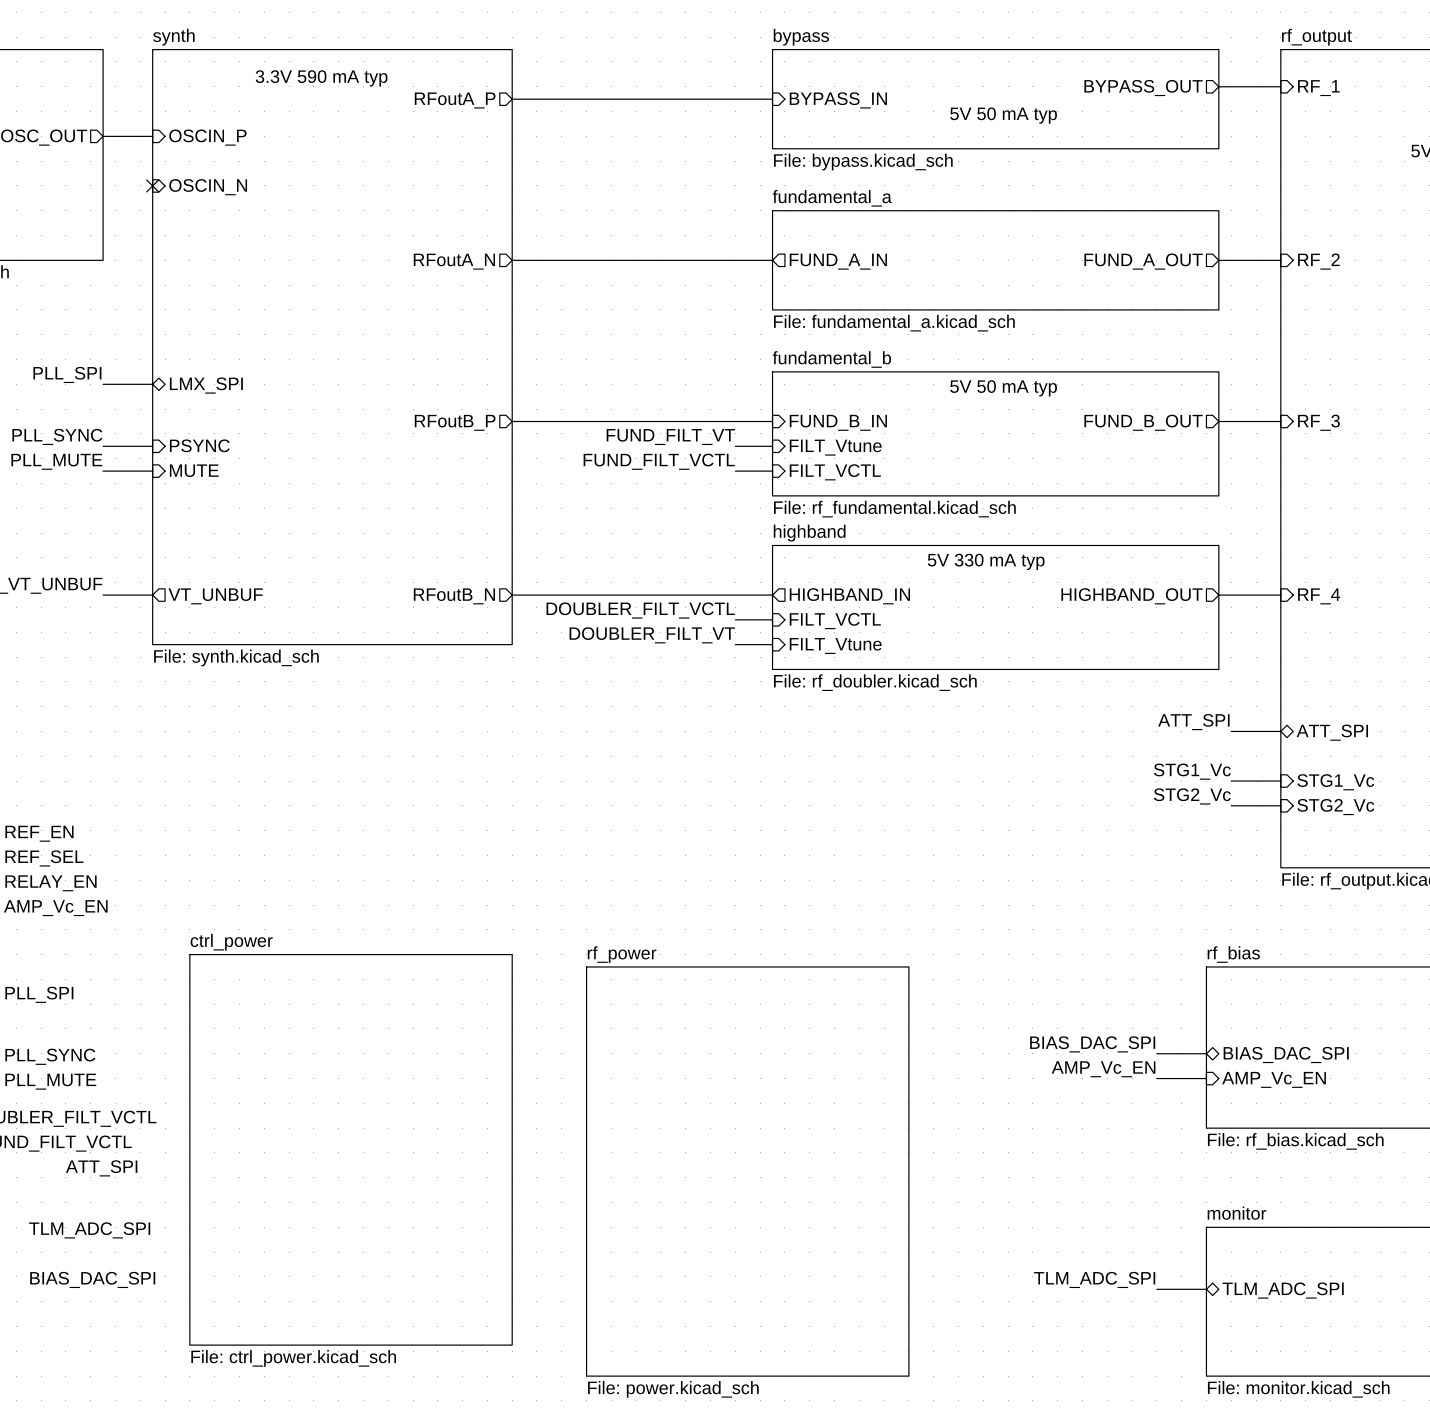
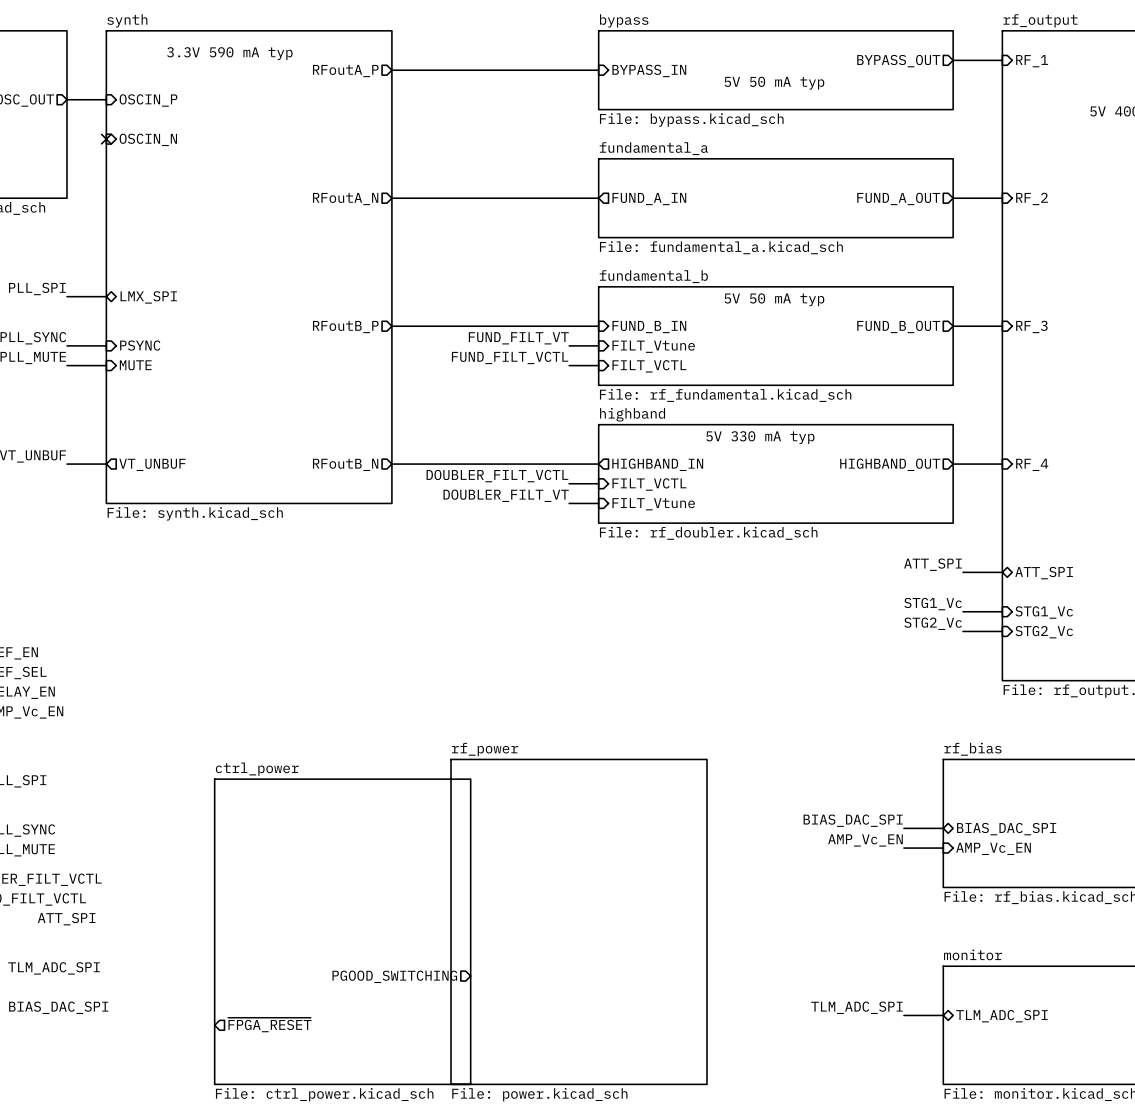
sheet ctrl_power: File: ctrl_power.kicad_sch (351, 1149) -> none
sheet ctrl_power: none -> File: ctrl_power.kicad_sch (342, 931)
sheet pin: none -> PGOOD_SWITCHING (394, 976)
sheet pin: none -> ~{FPGA_RESET} (269, 1024)

